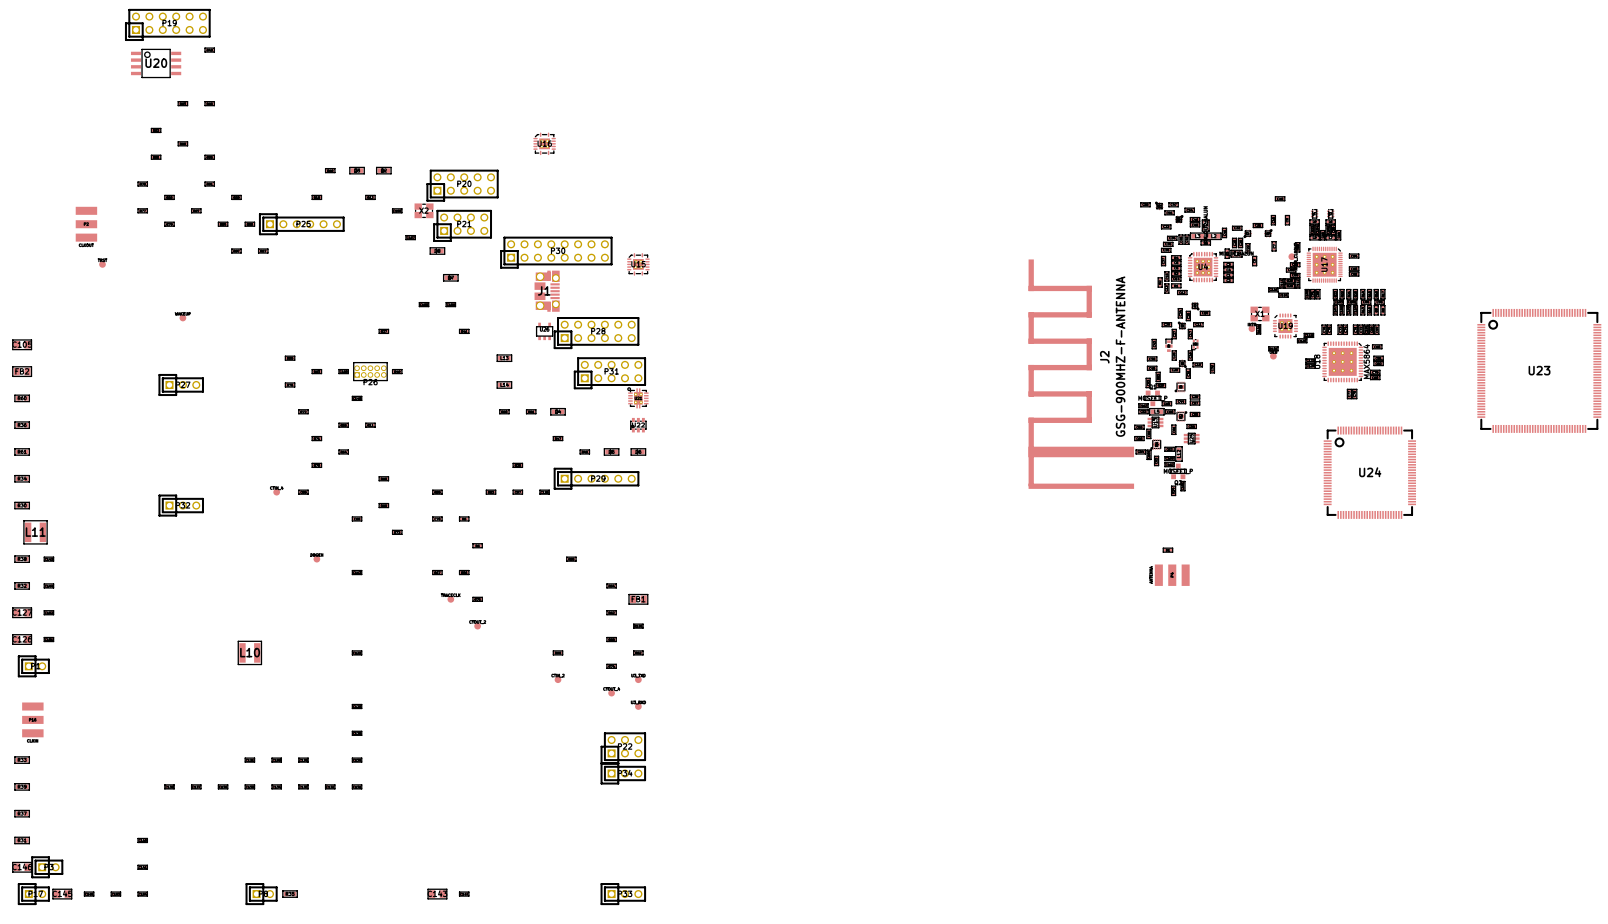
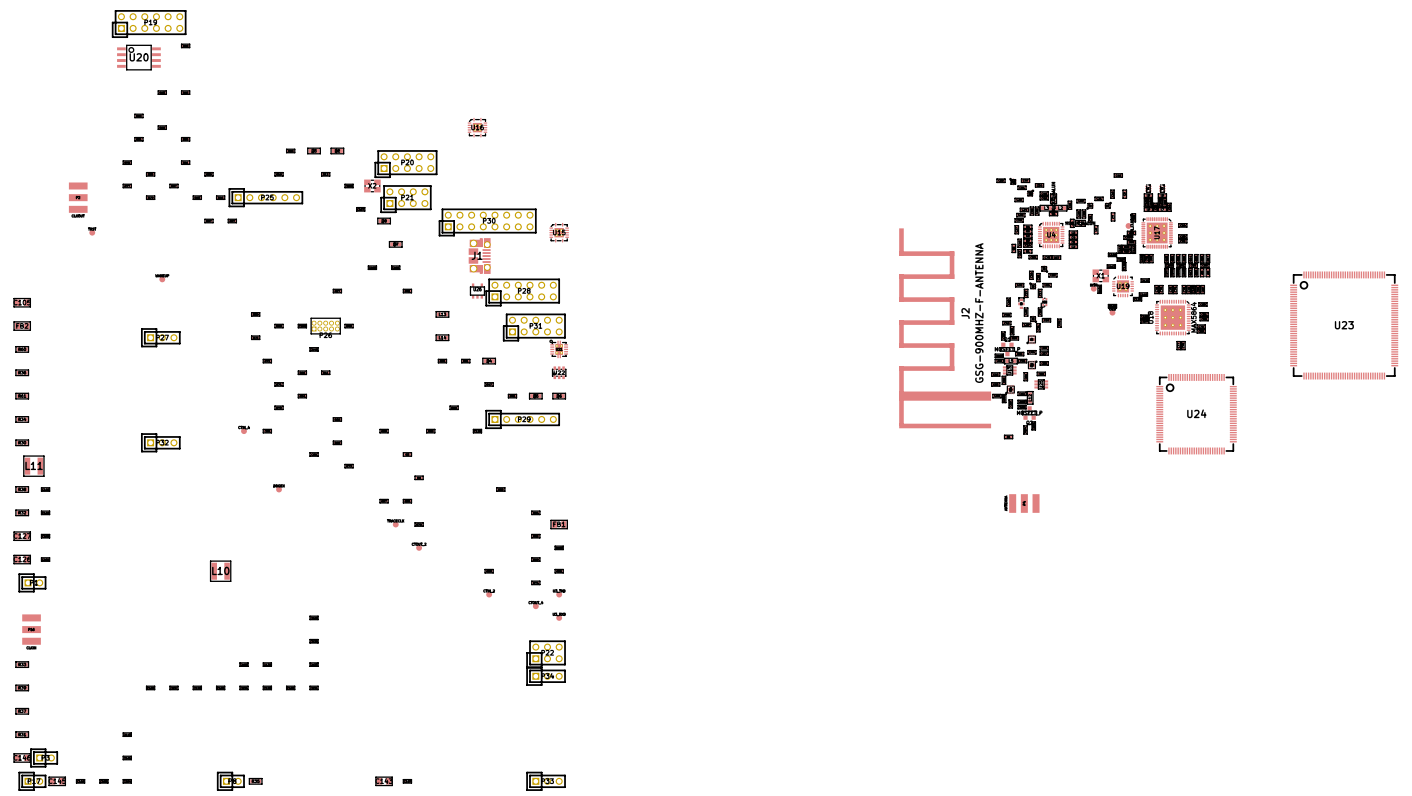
part position: (517, 492) -> (1056, 257)
part position: (437, 518) -> (1047, 257)
part position: (1167, 550) -> (1008, 436)
part position: (357, 572) -> (1111, 266)
part position: (357, 652) -> (1145, 280)
part rotation: 0° (249, 760) -> 90° clockwise (1124, 266)
part position: (249, 760) -> (1124, 266)

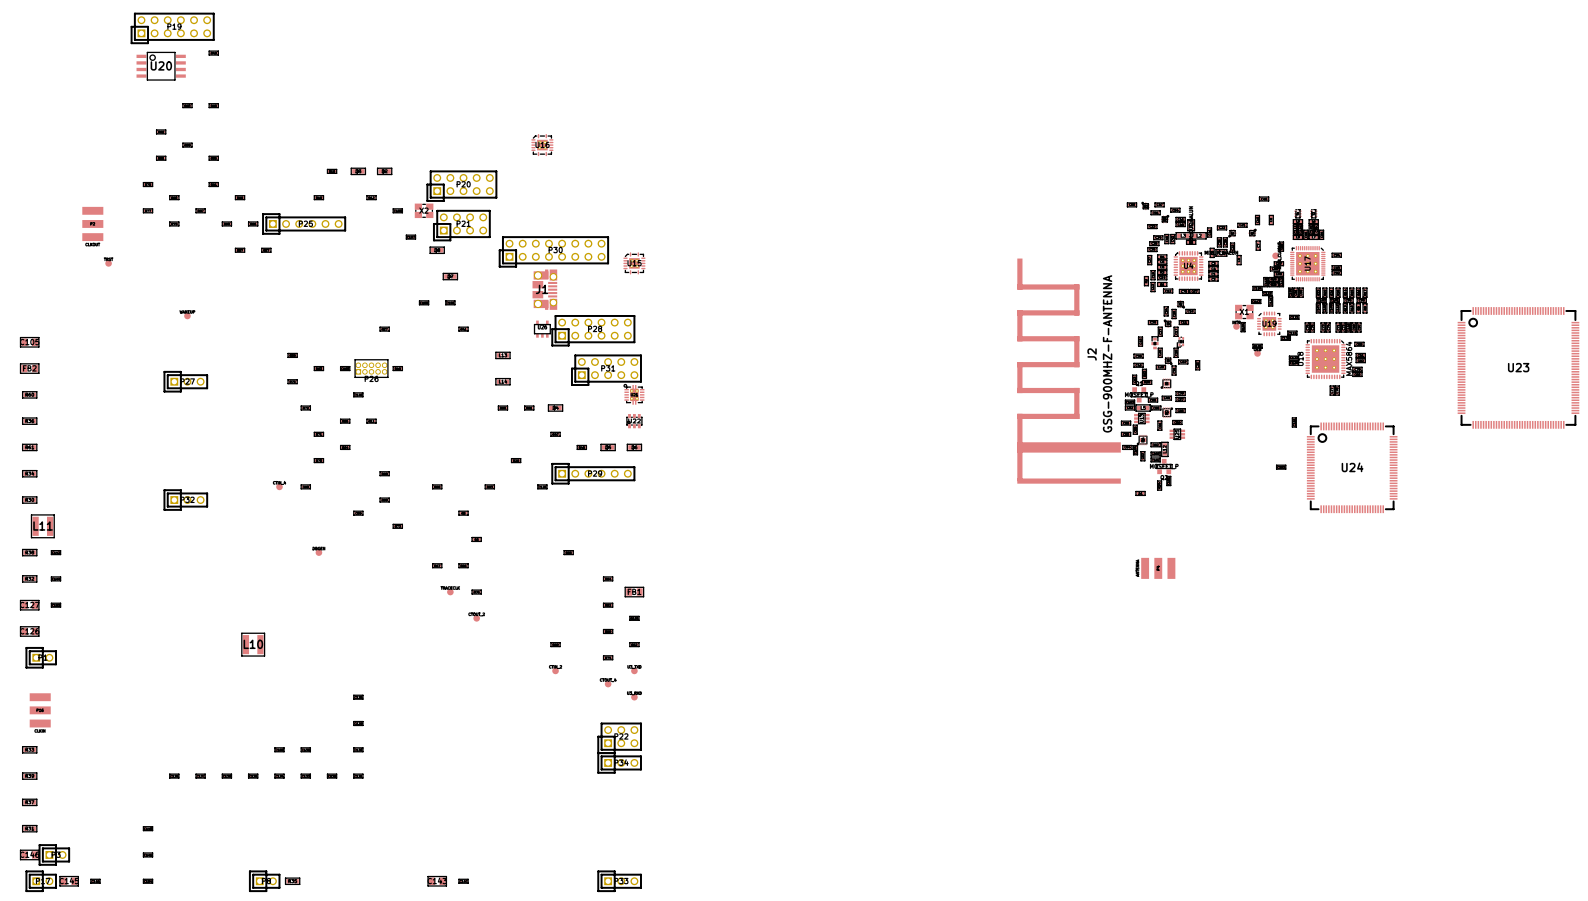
part rotation: 0° (45, 559) -> 90° clockwise (1294, 422)
part position: (45, 559) -> (1294, 422)
part position: (103, 781) -> (1281, 467)

